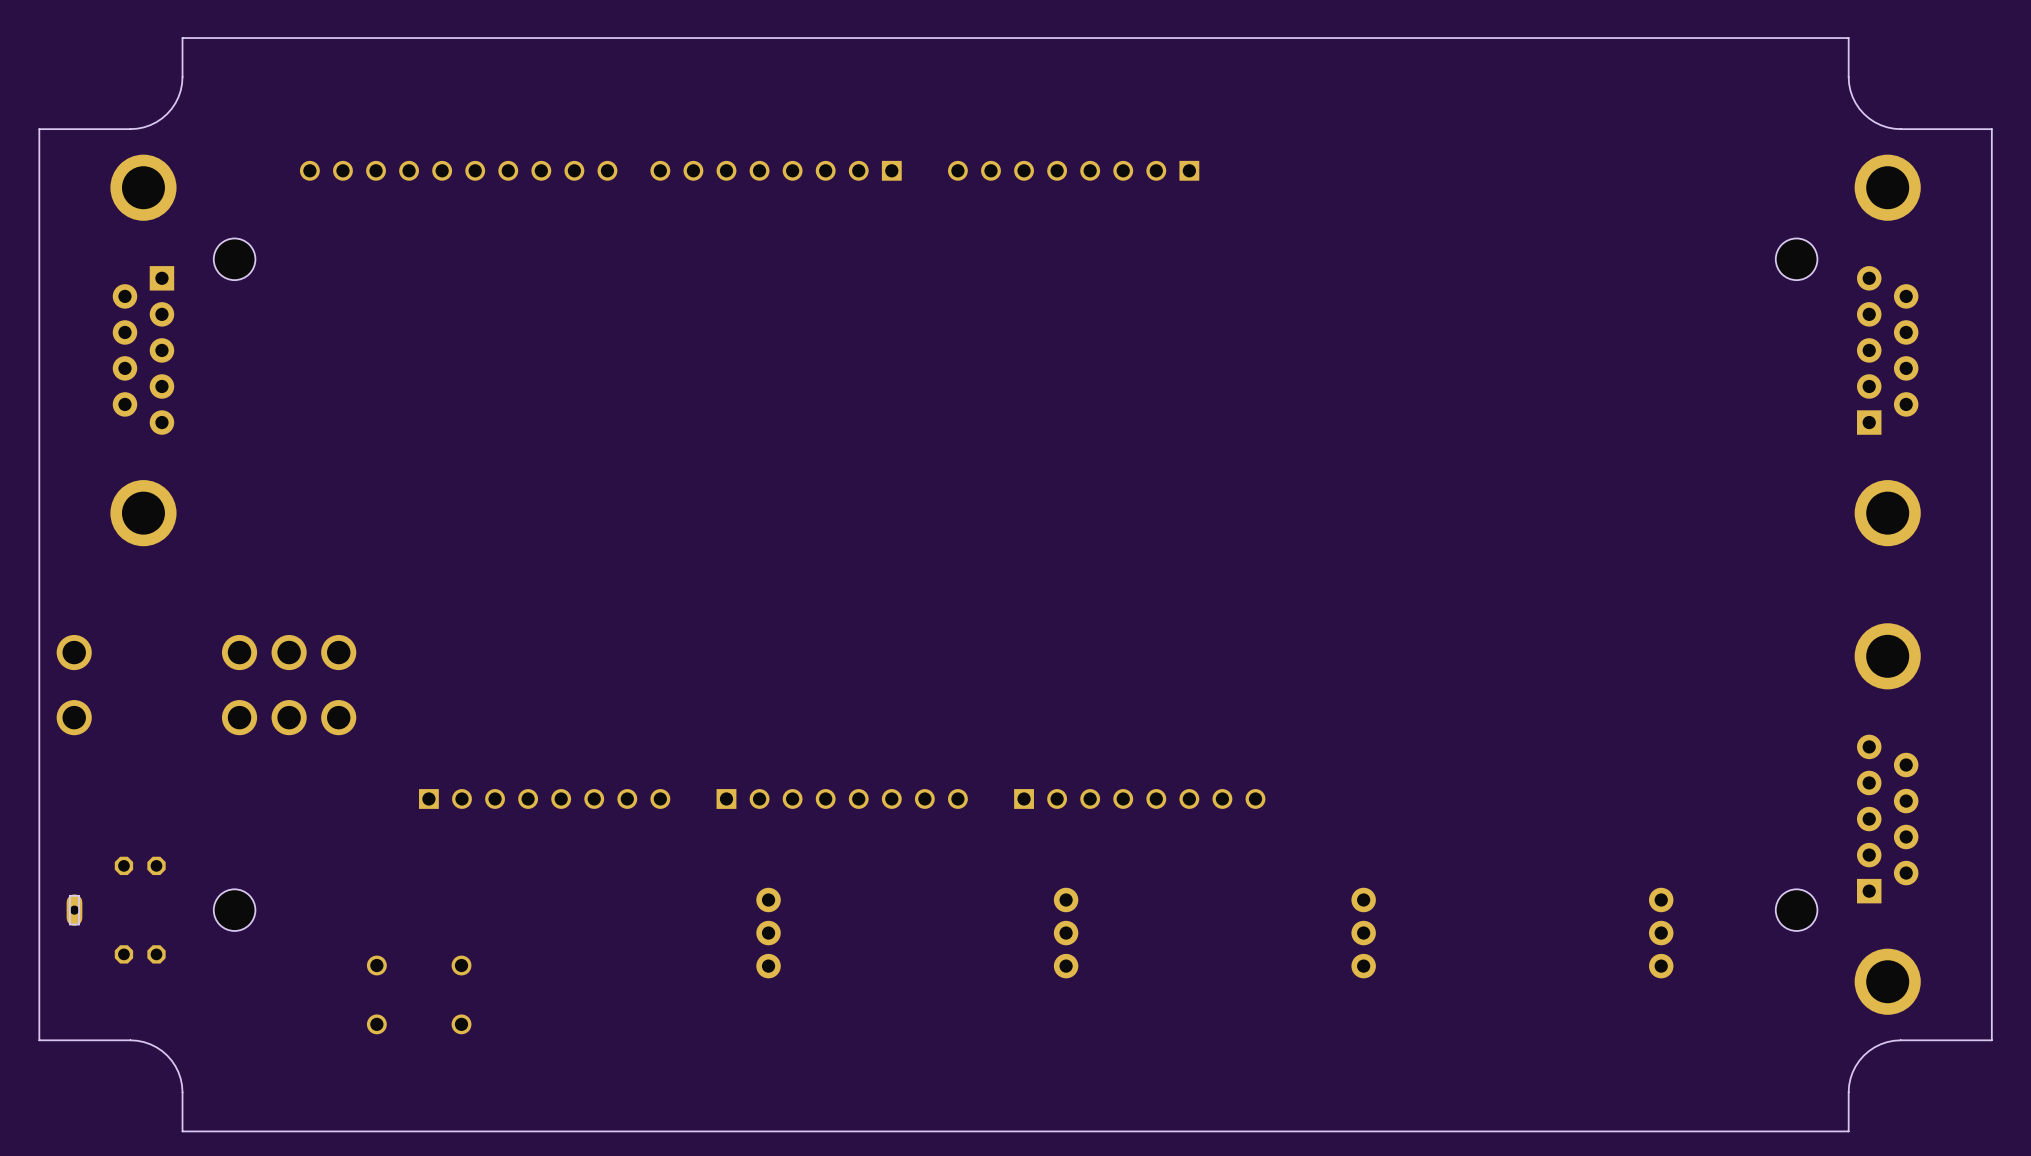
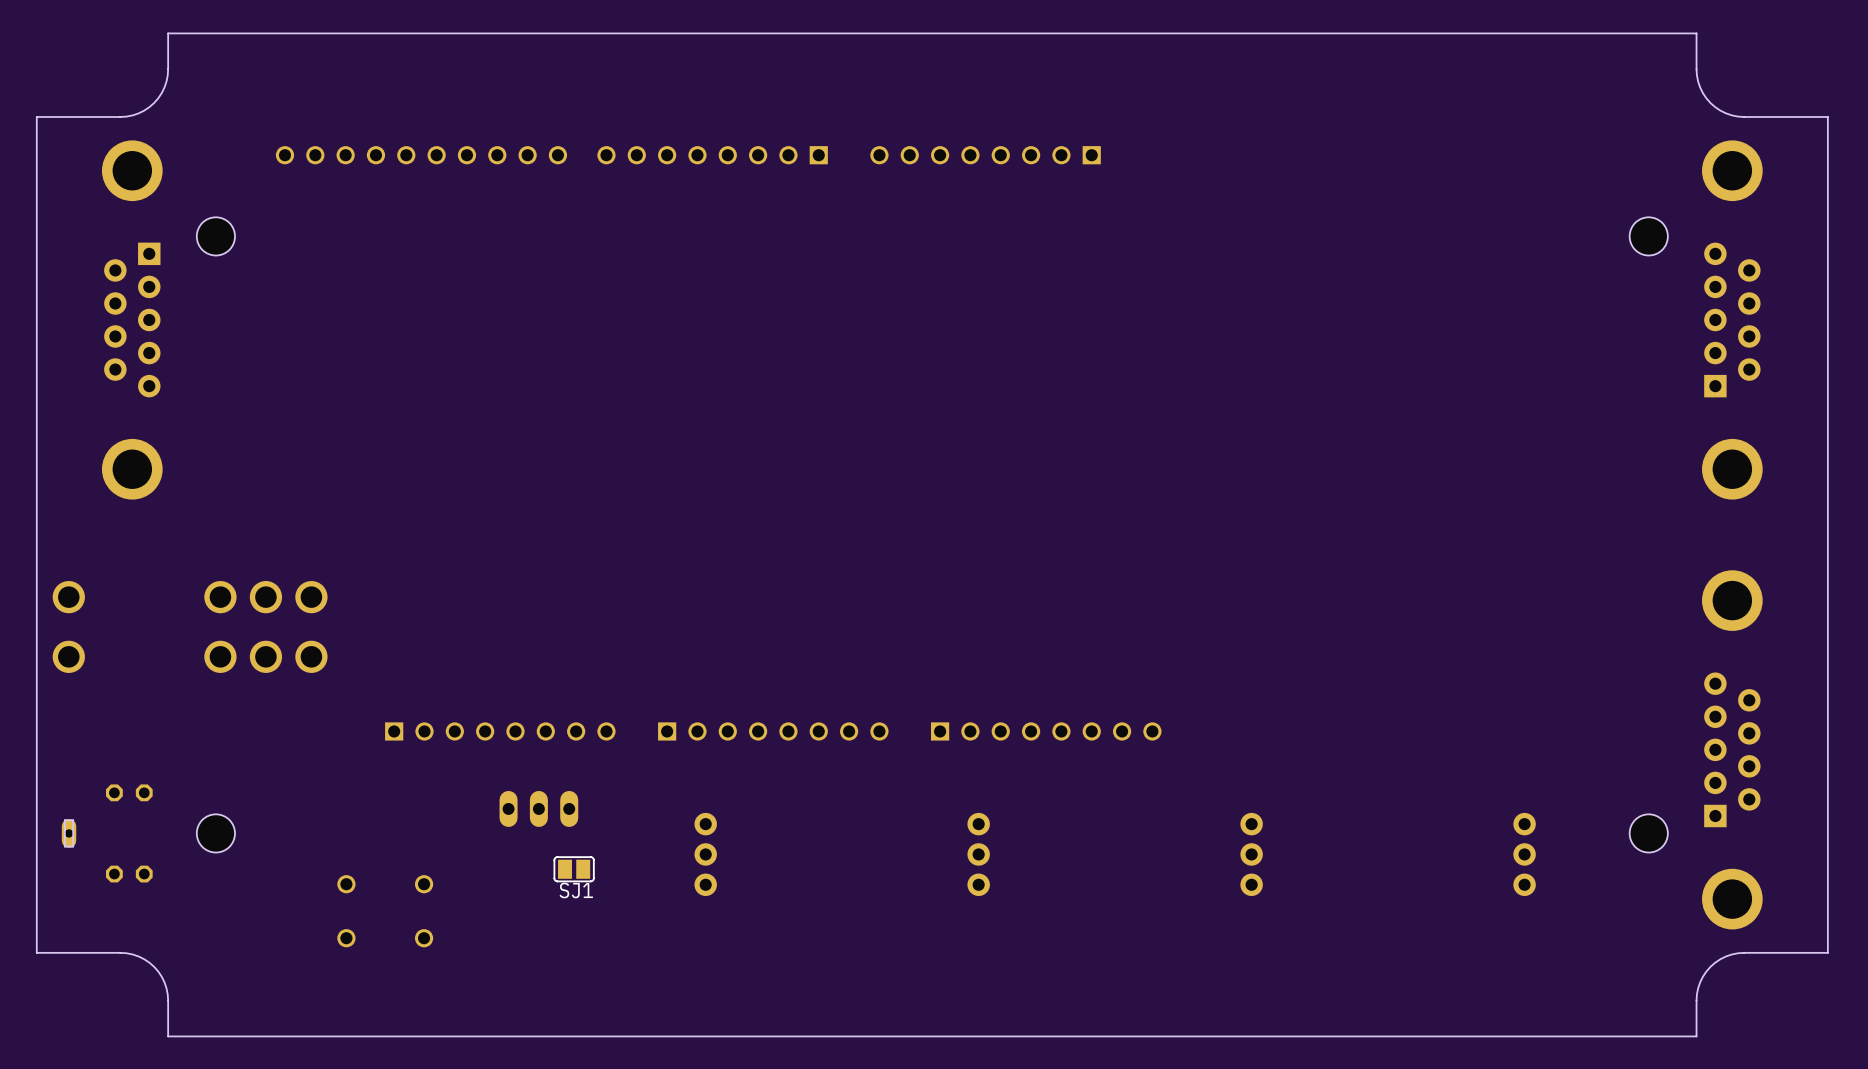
part: none -> (538, 808)
SJ1: none -> (574, 869)

